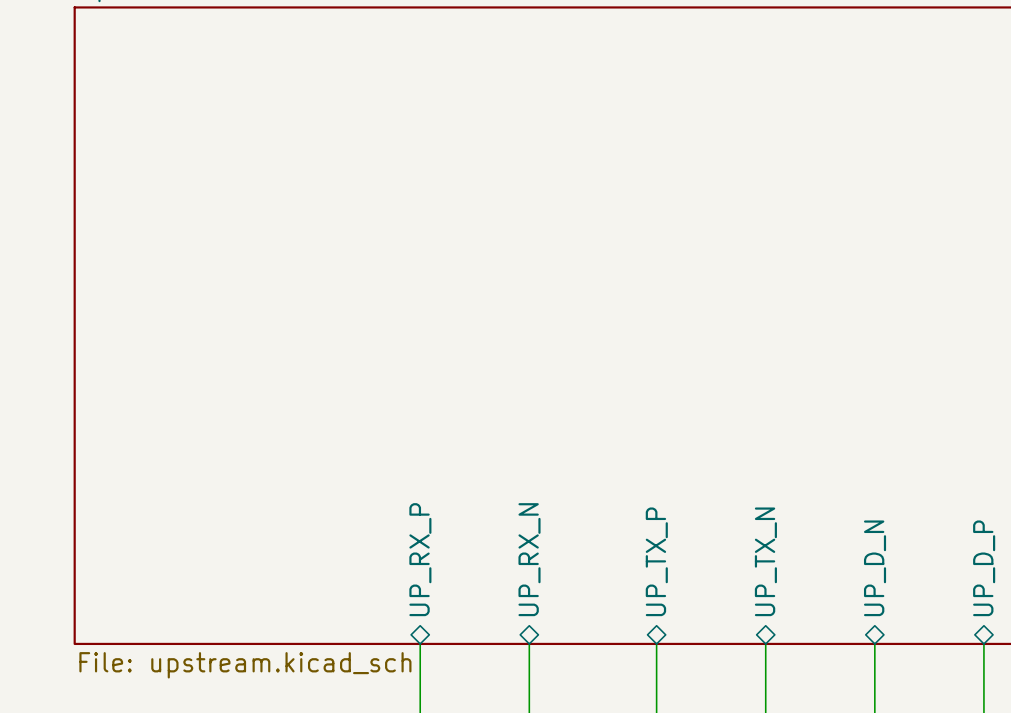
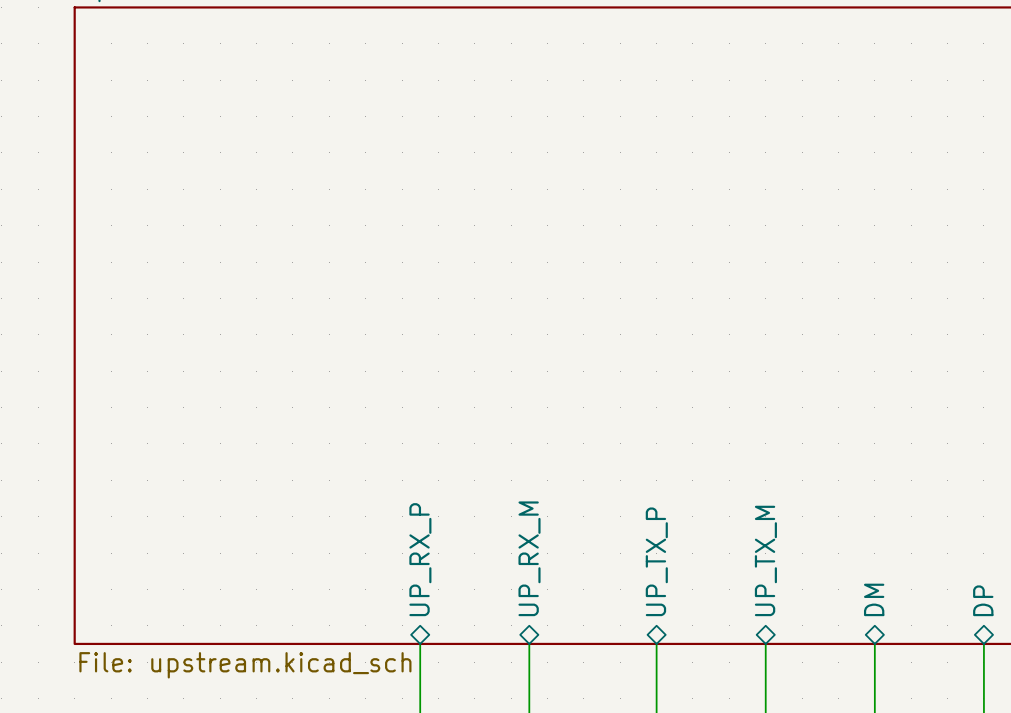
sheet pin: UP_RX_N (529, 559) -> UP_RX_M (529, 558)
sheet pin: UP_TX_N (765, 561) -> UP_TX_M (765, 560)
sheet pin: UP_D_N (875, 568) -> DM (874, 599)
sheet pin: UP_D_P (984, 568) -> DP (983, 600)

